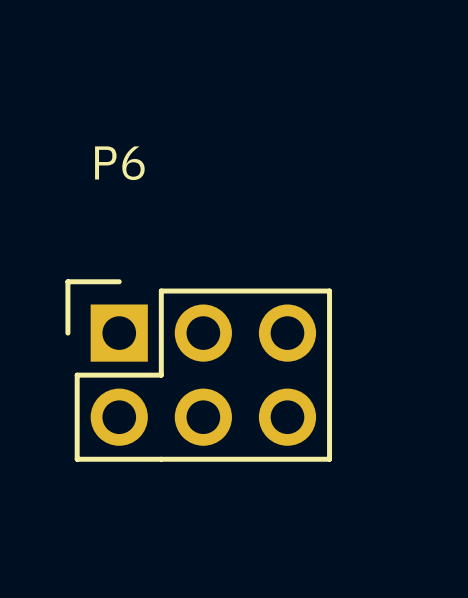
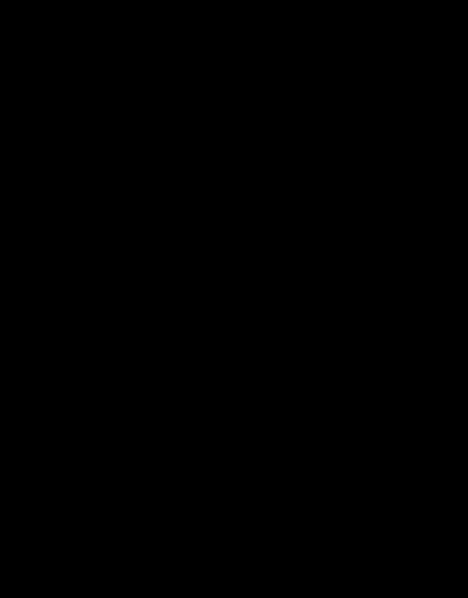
P6: (198, 370) -> none

